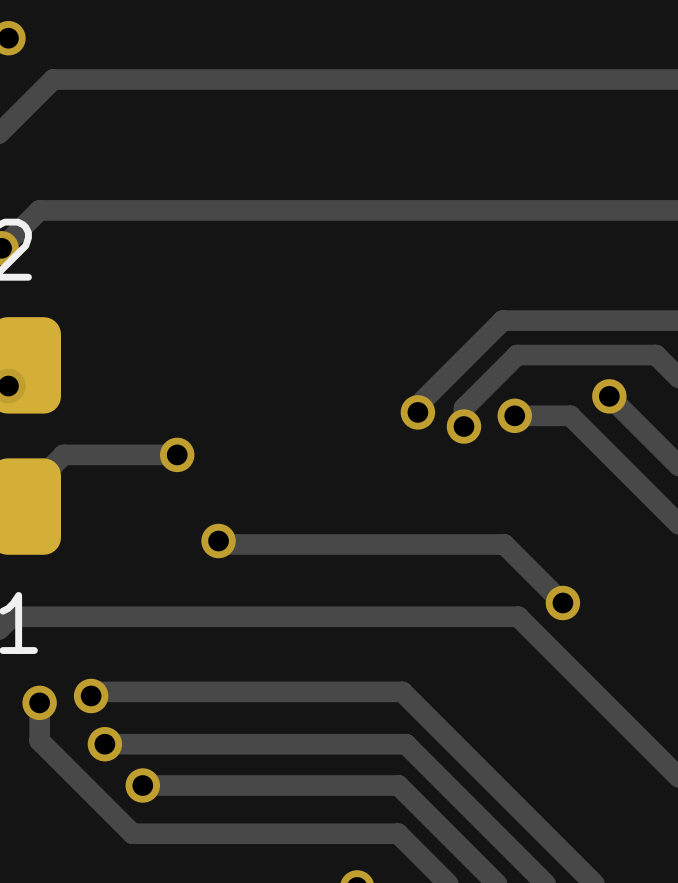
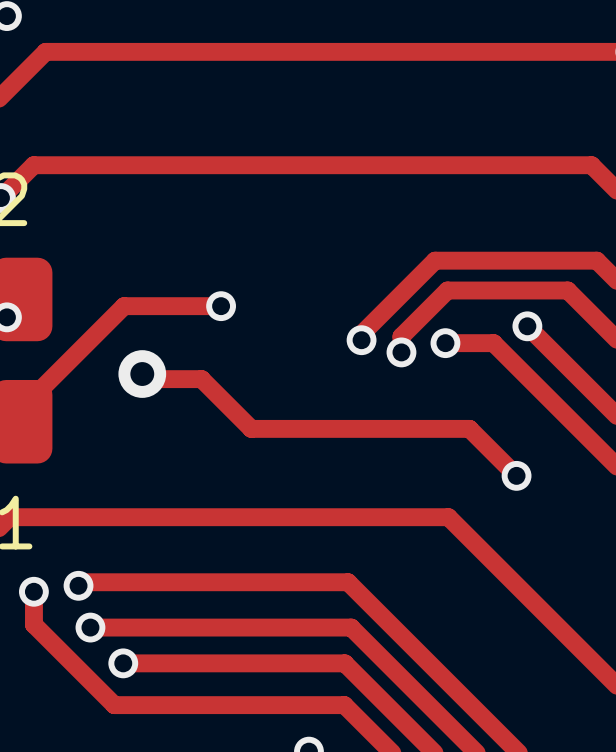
via: none -> (221, 306)
via size: [160, 437, 195, 473] -> [118, 350, 167, 398]
track: none -> (142, 374) (147, 379) (201, 379) (251, 428) (469, 428) (516, 475)
track: (177, 454) (63, 454) (29, 489) -> (221, 306) (124, 306) (24, 406)
track: (218, 541) (221, 544) (504, 544) (562, 603) -> none
via: (218, 541) -> none
via position: (562, 603) -> (516, 475)

